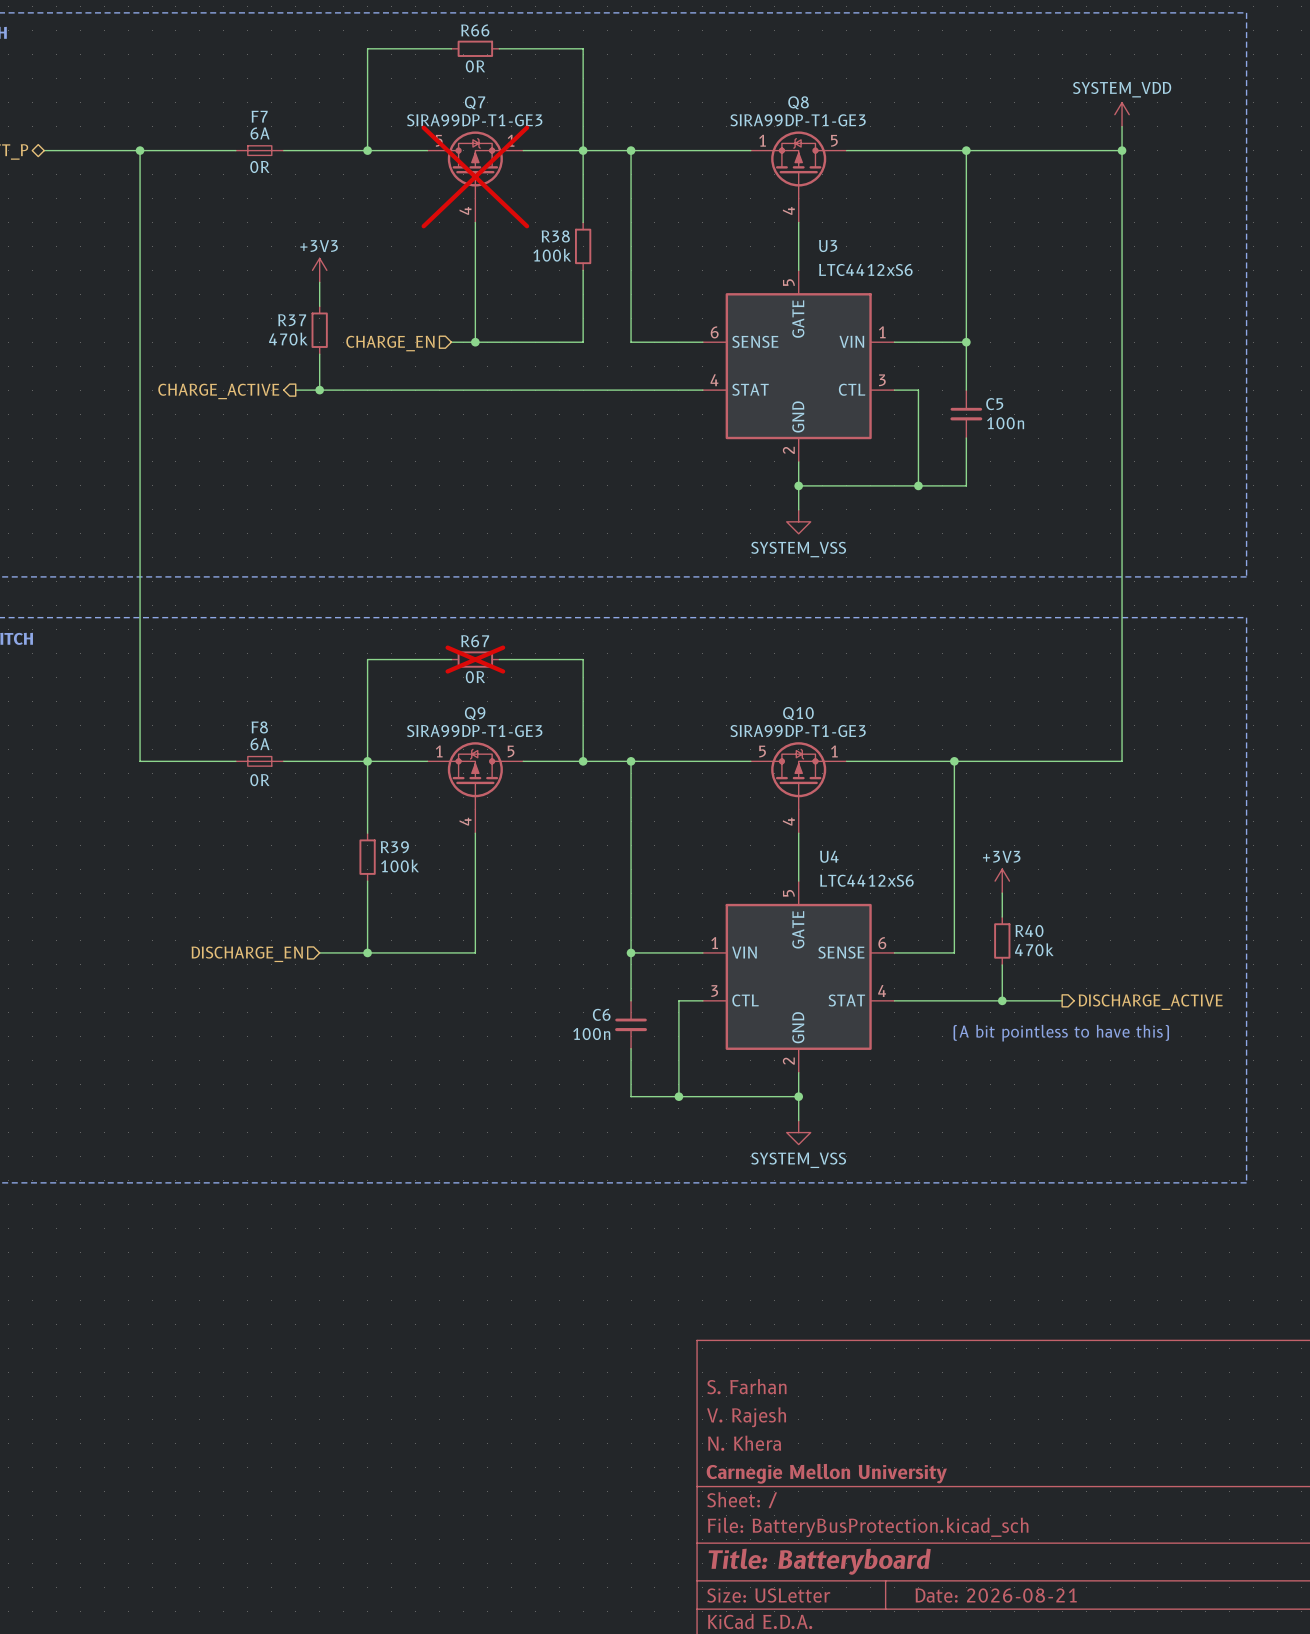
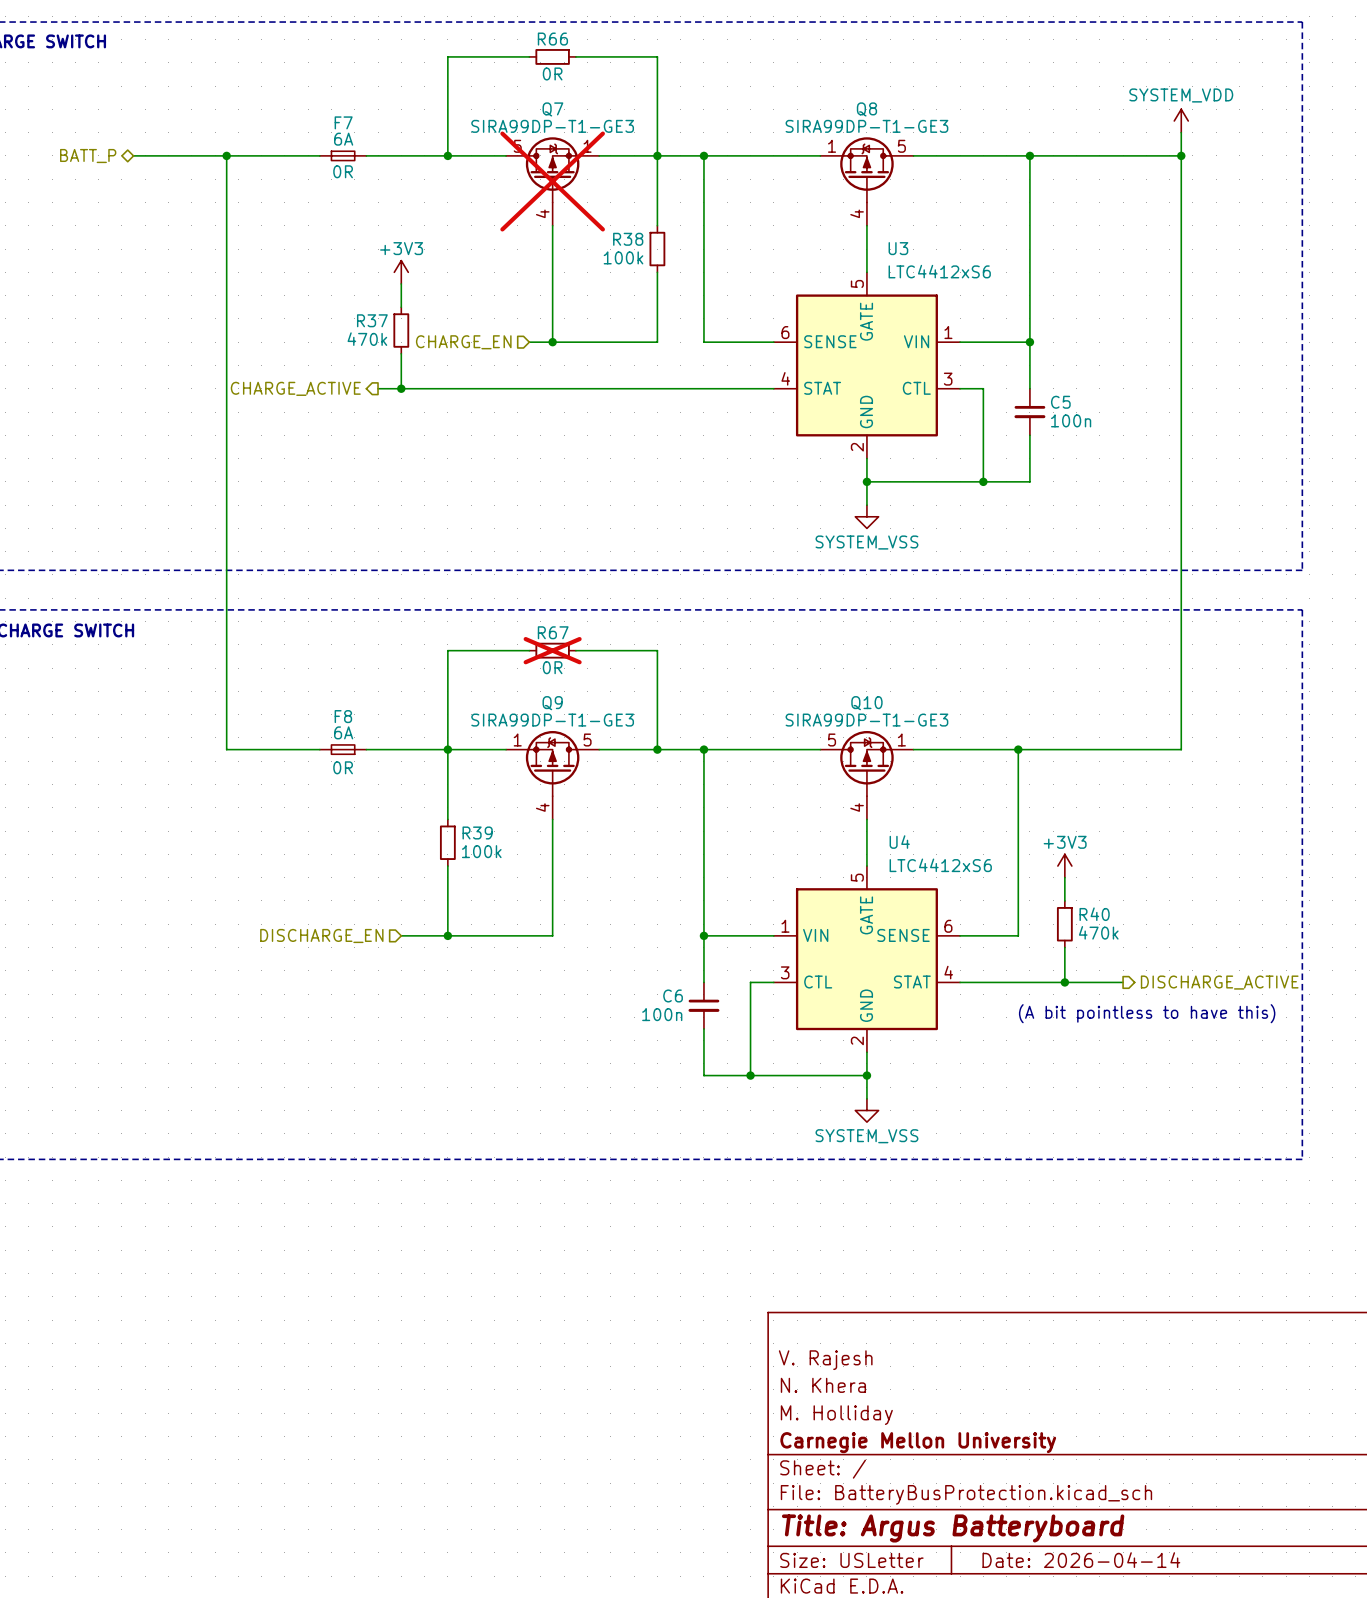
title block: S. Farhan (746, 1386) -> V. Rajesh (825, 1360)
title block: V. Rajesh (746, 1417) -> N. Khera (823, 1385)
title block: N. Khera (744, 1443) -> M. Holliday (836, 1415)
title block: Title: Batteryboard (819, 1561) -> Title: Argus Batteryboard (953, 1528)
title block: Date: 2026-08-21 (996, 1595) -> Date: 2026-04-14 (1081, 1560)

